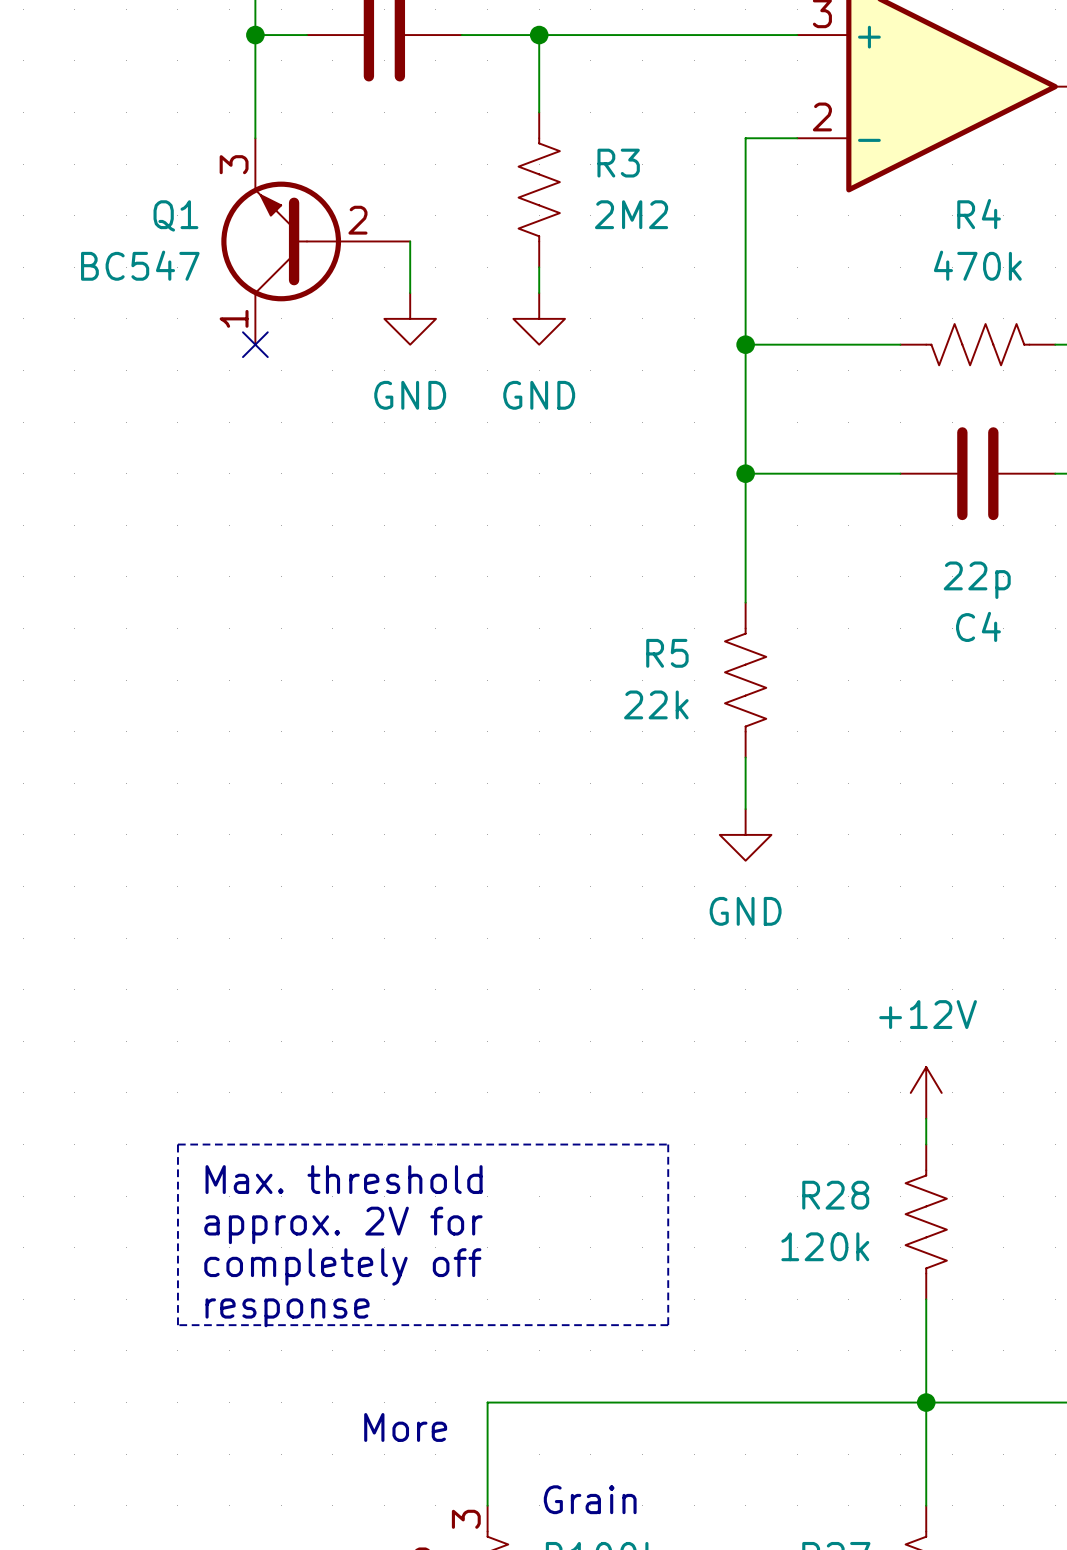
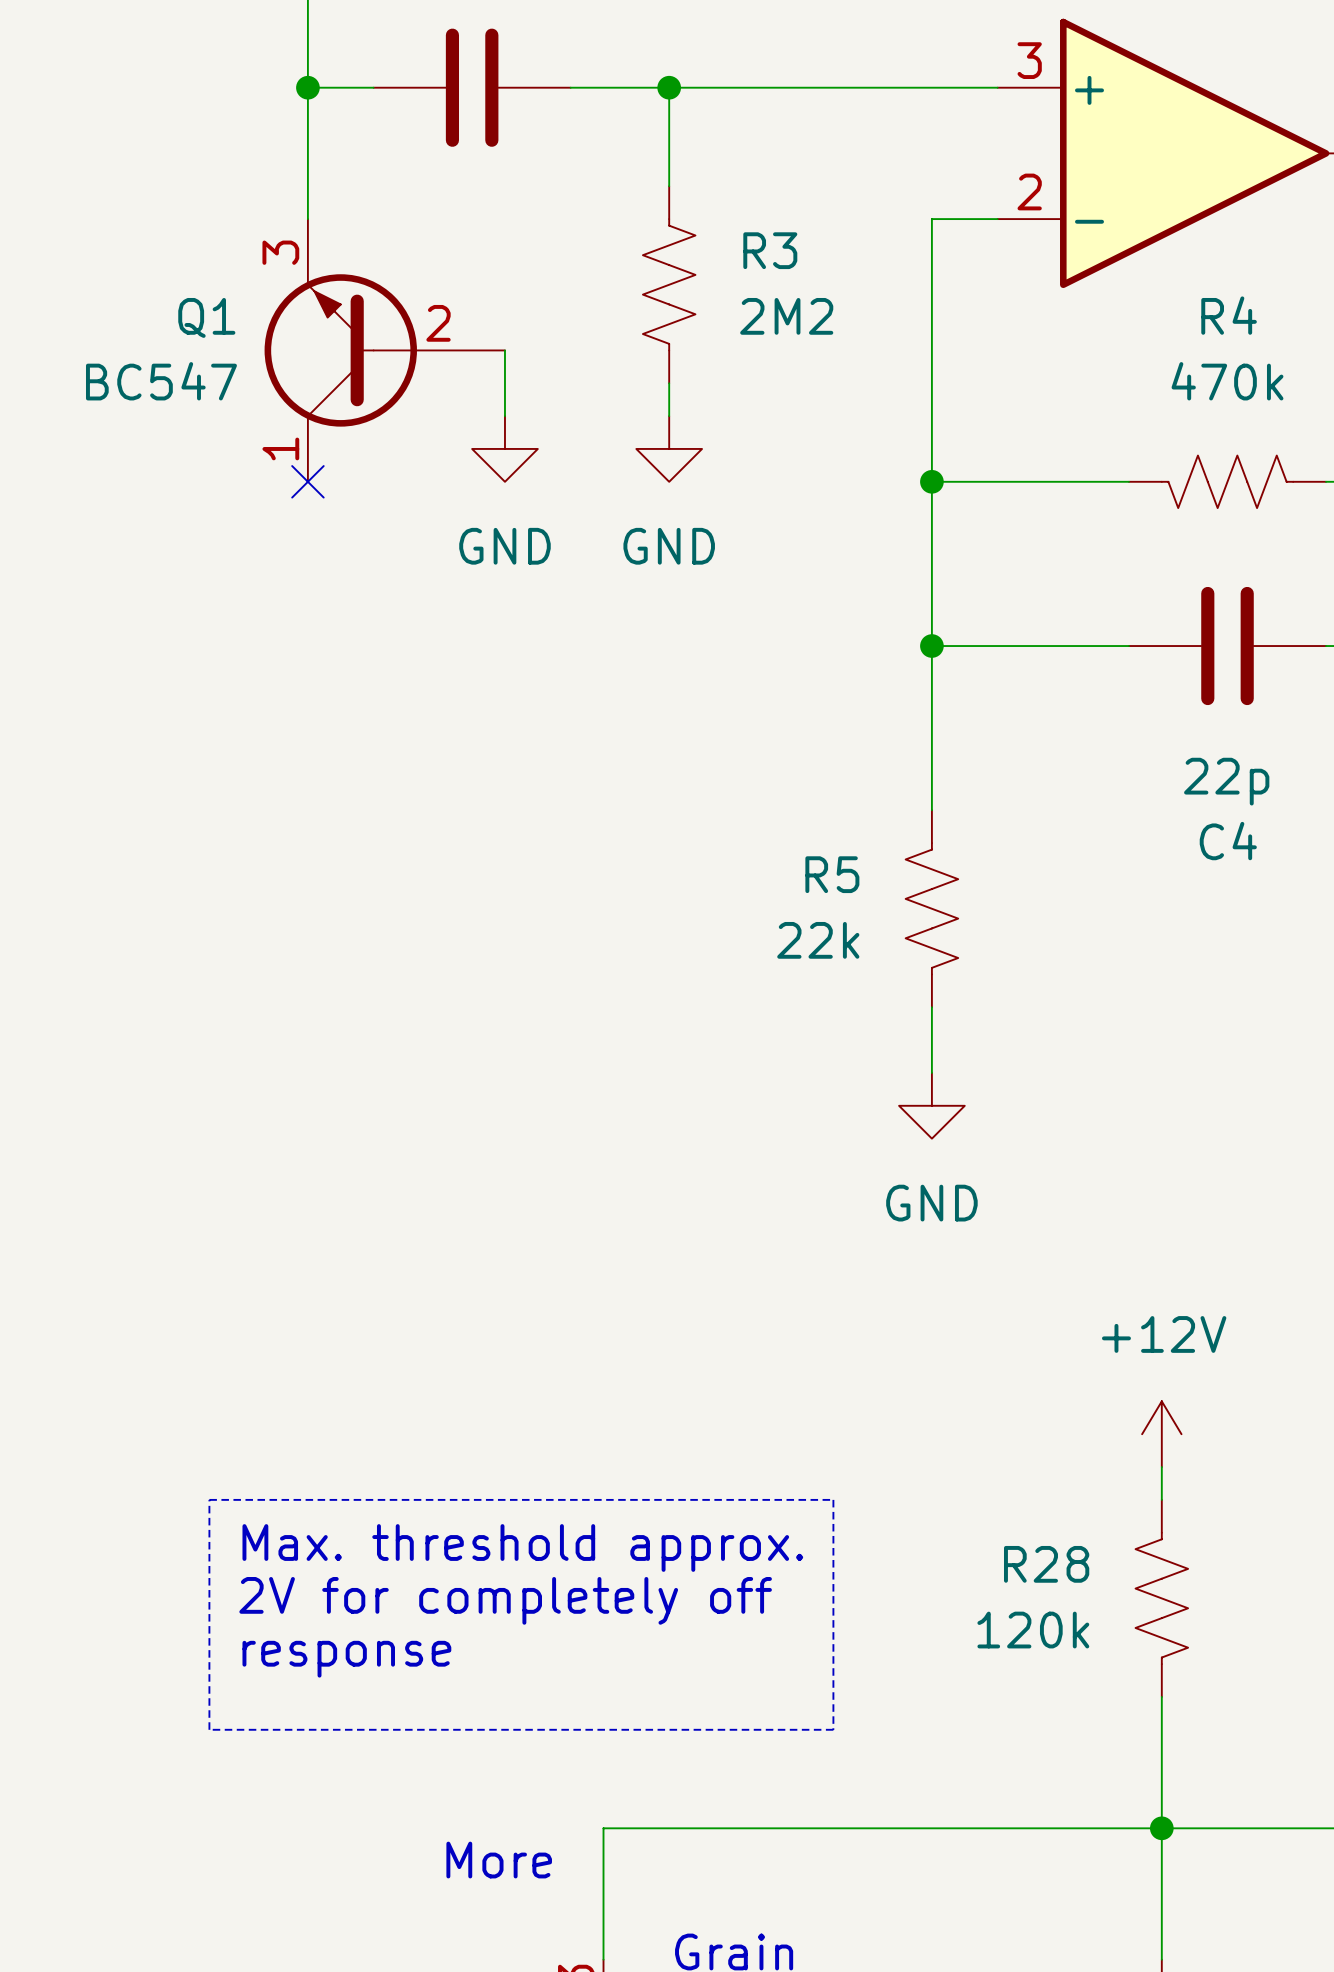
text: Max. threshold (344, 1179) -> Max. threshold approx. (522, 1547)
text: approx. 2V for (343, 1225) -> 2V for completely off (505, 1600)
text: completely off (342, 1266) -> none
text position: response (287, 1312) -> response (346, 1659)

